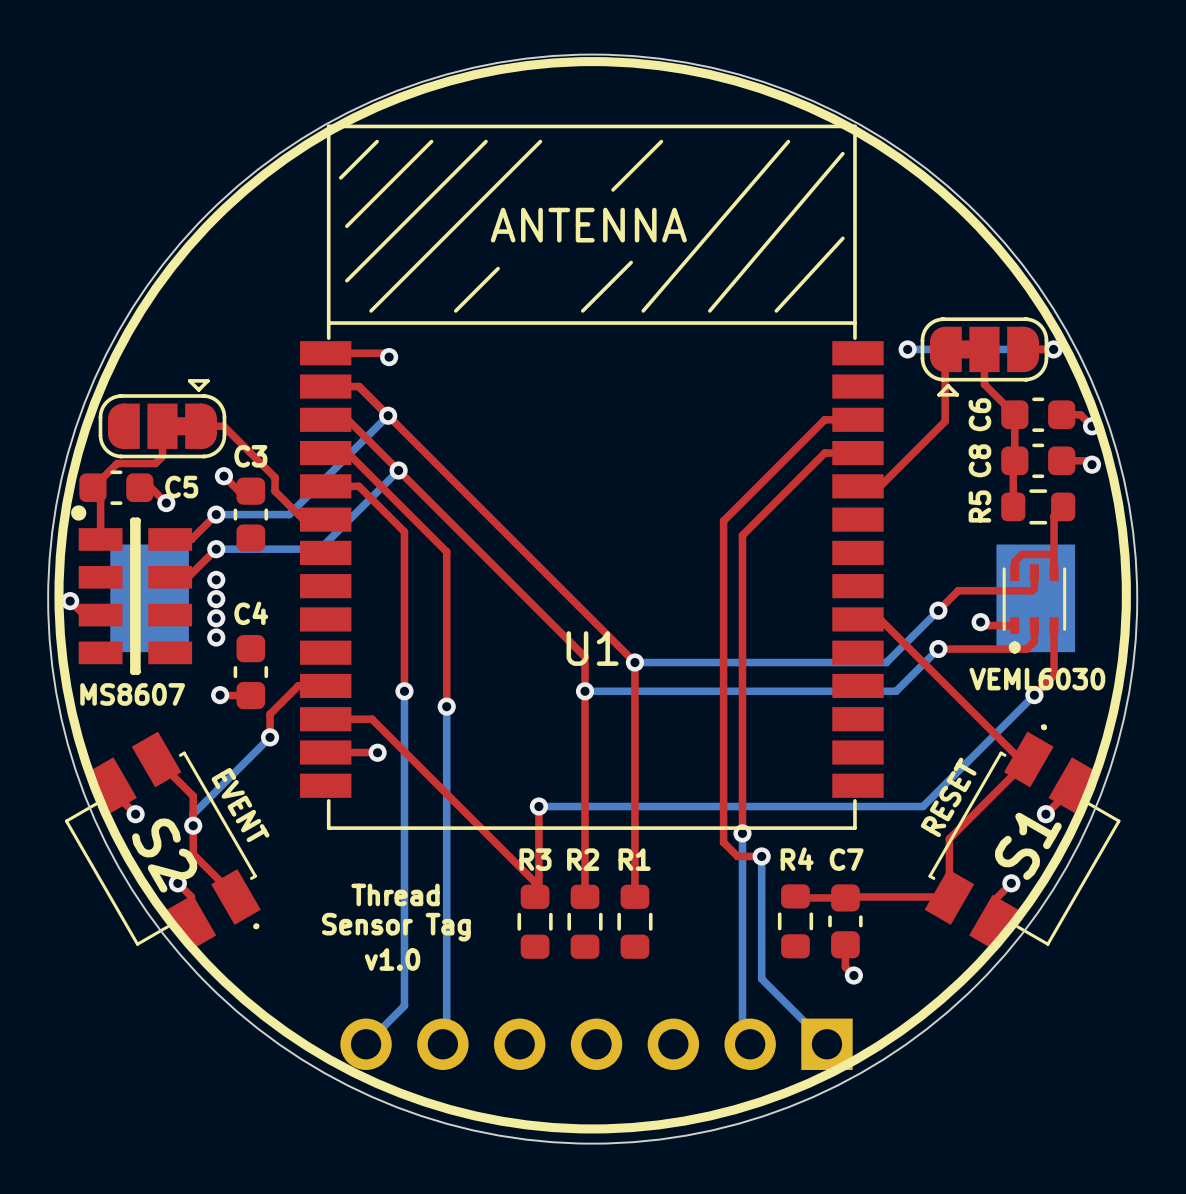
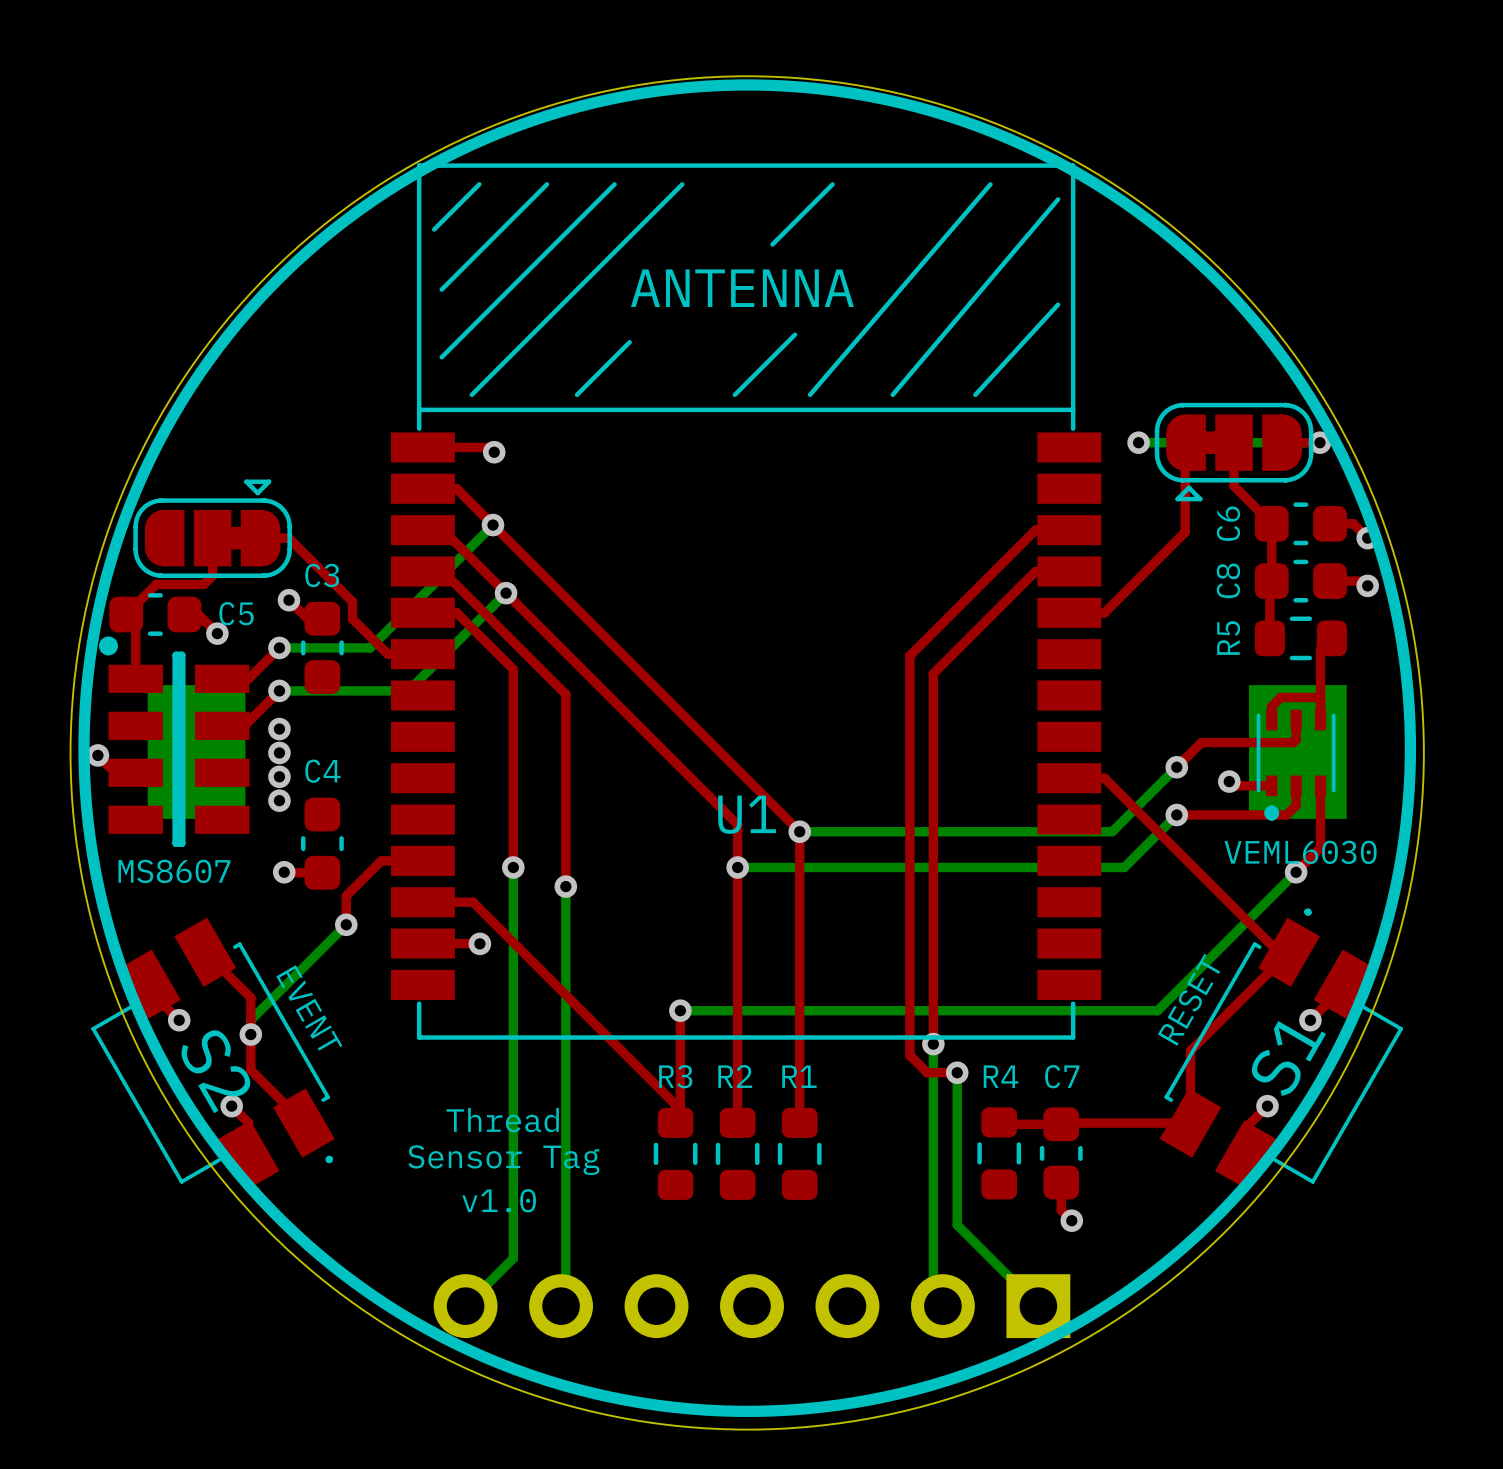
U1 footprint: [299, 124, 884, 830] -> [390, 163, 1102, 1040]

